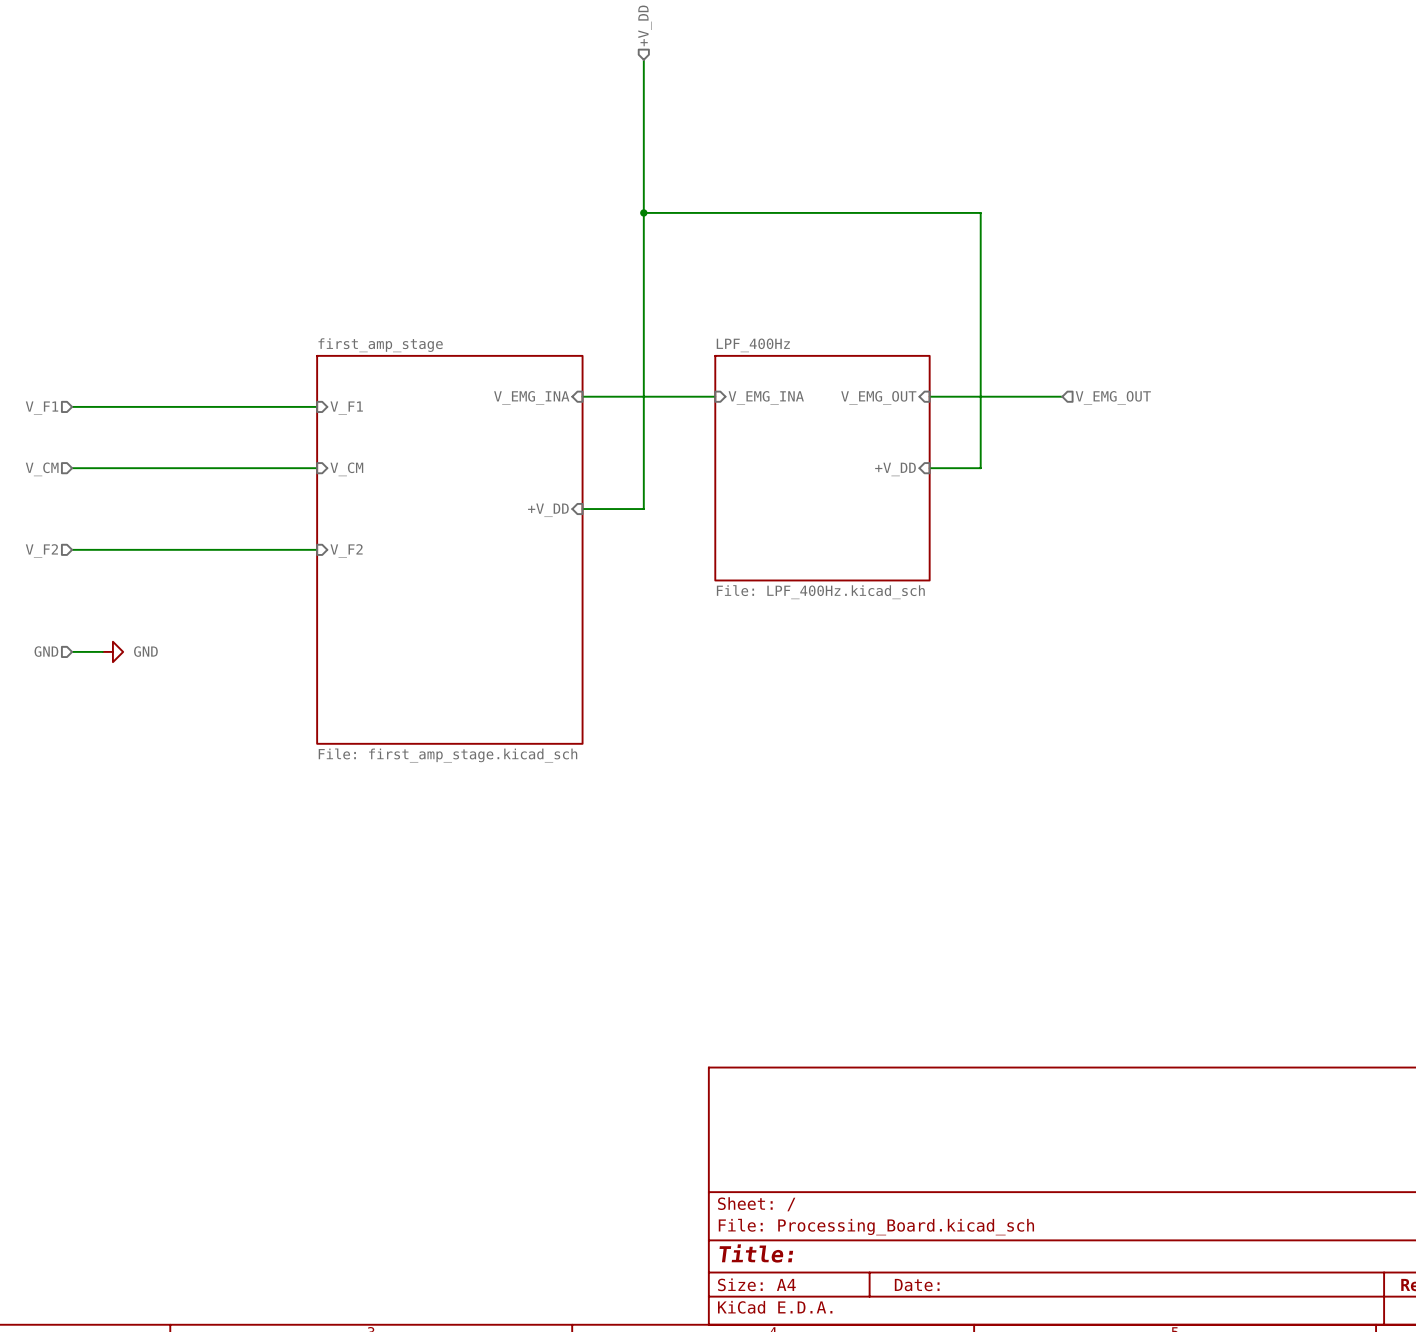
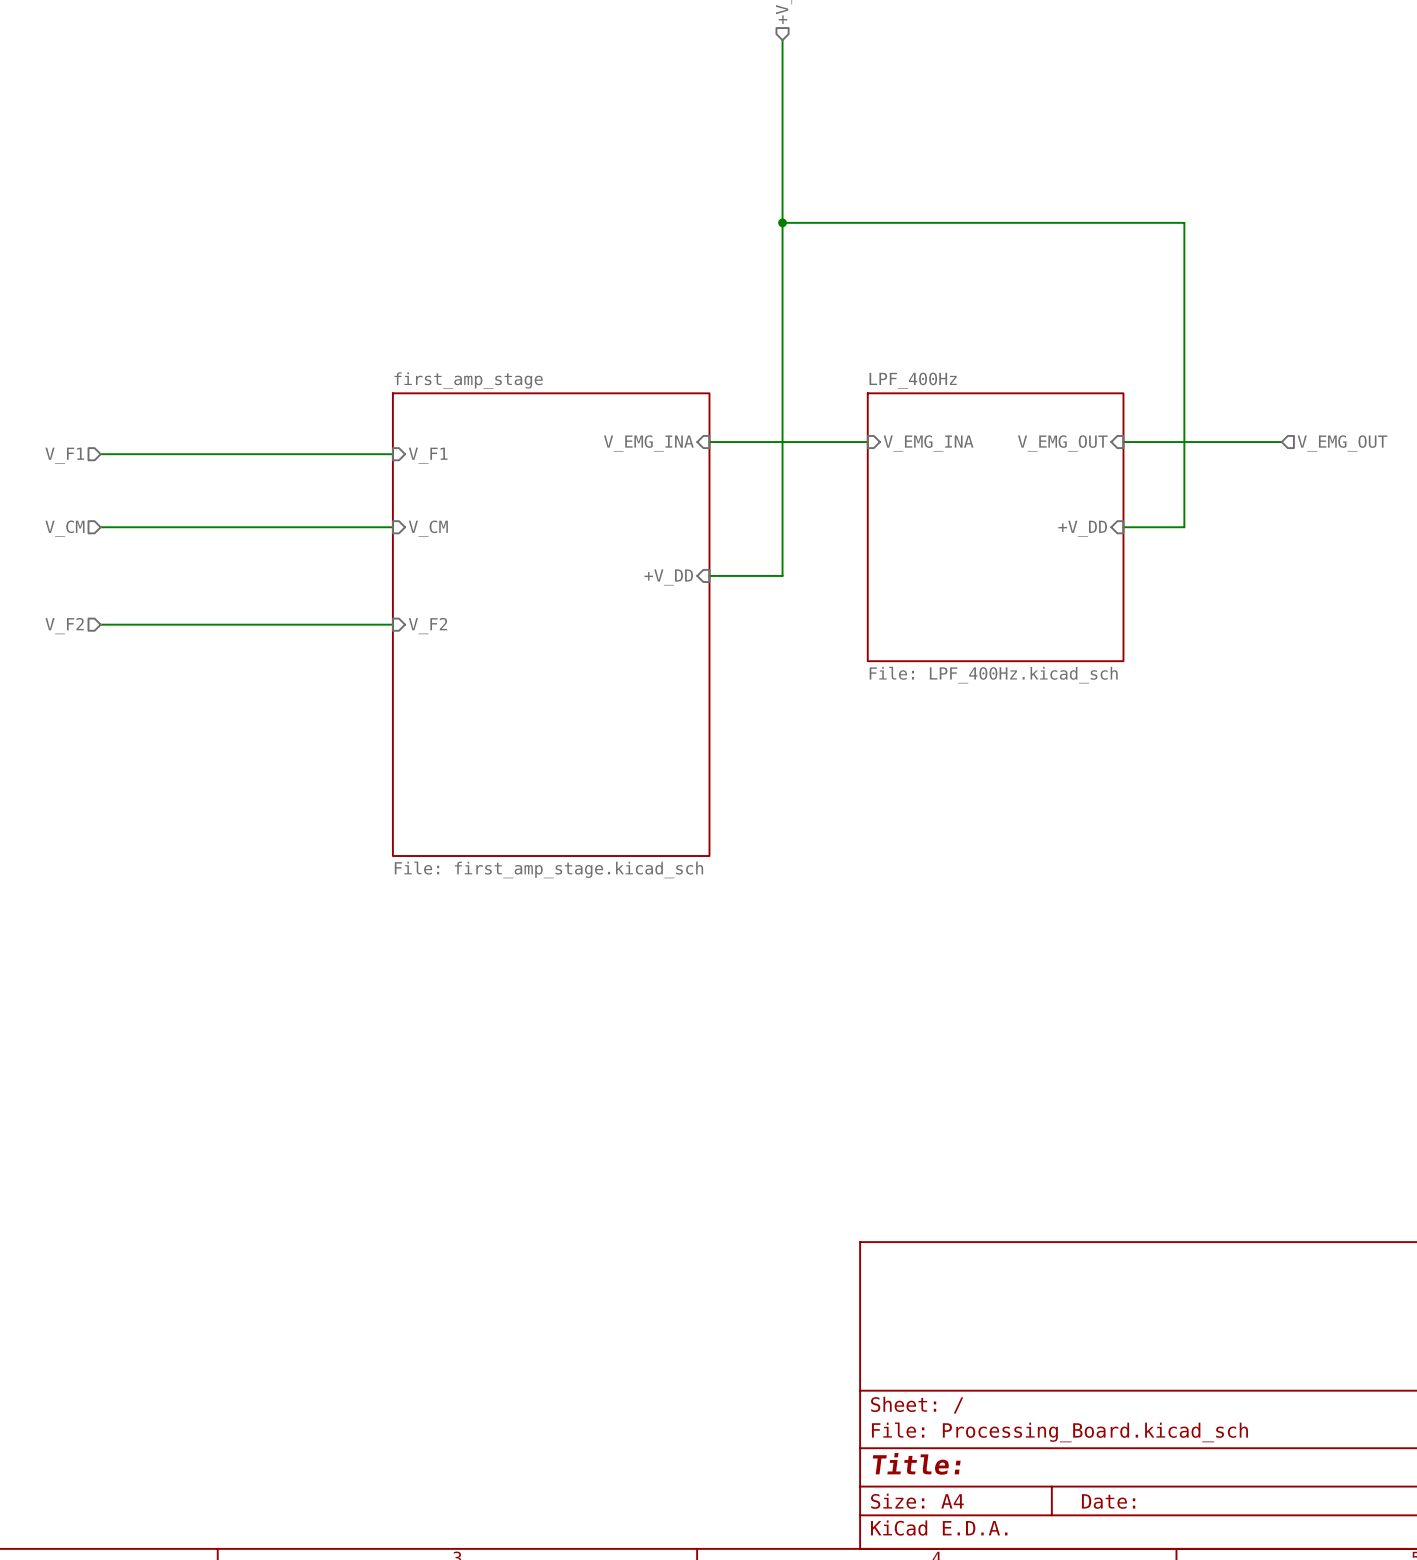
hierarchical label: GND (46, 651) -> none
wire: (72, 651) (102, 651) -> none
power symbol: GND (112, 651) -> none

